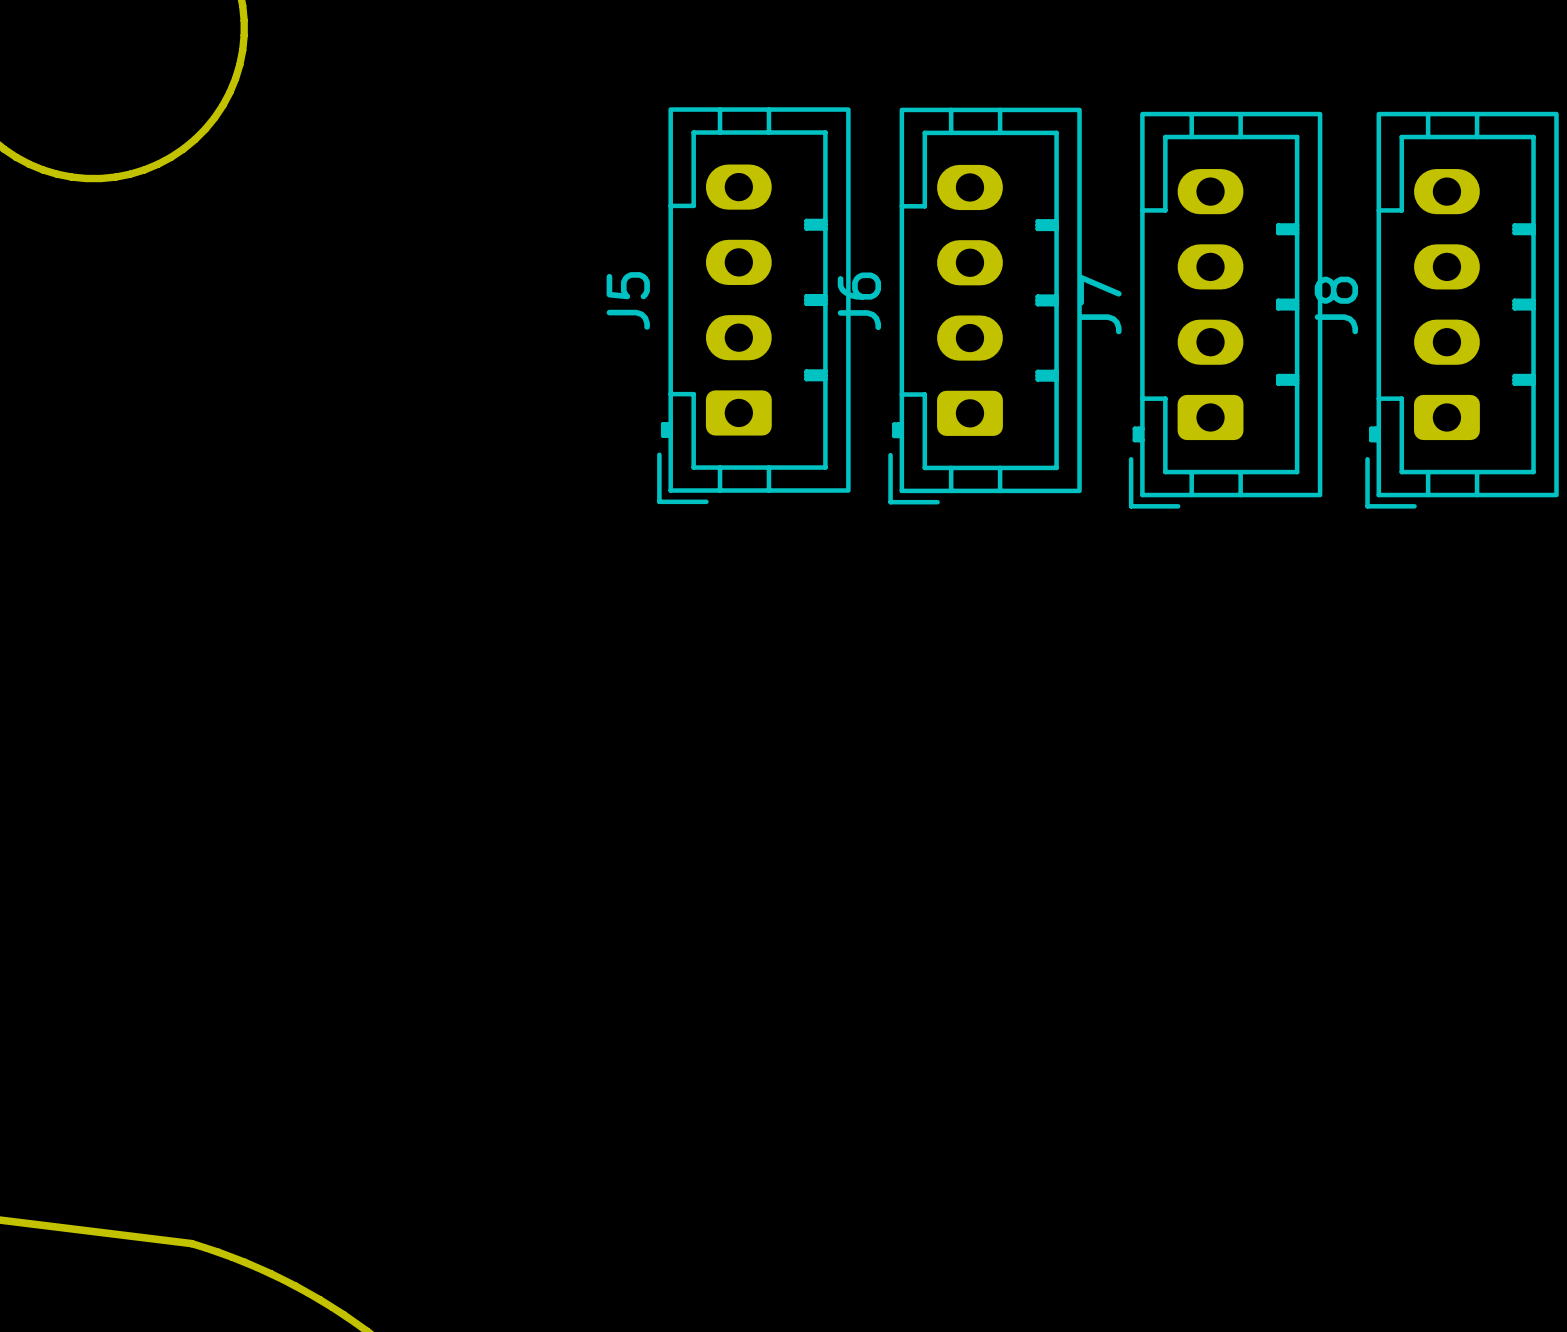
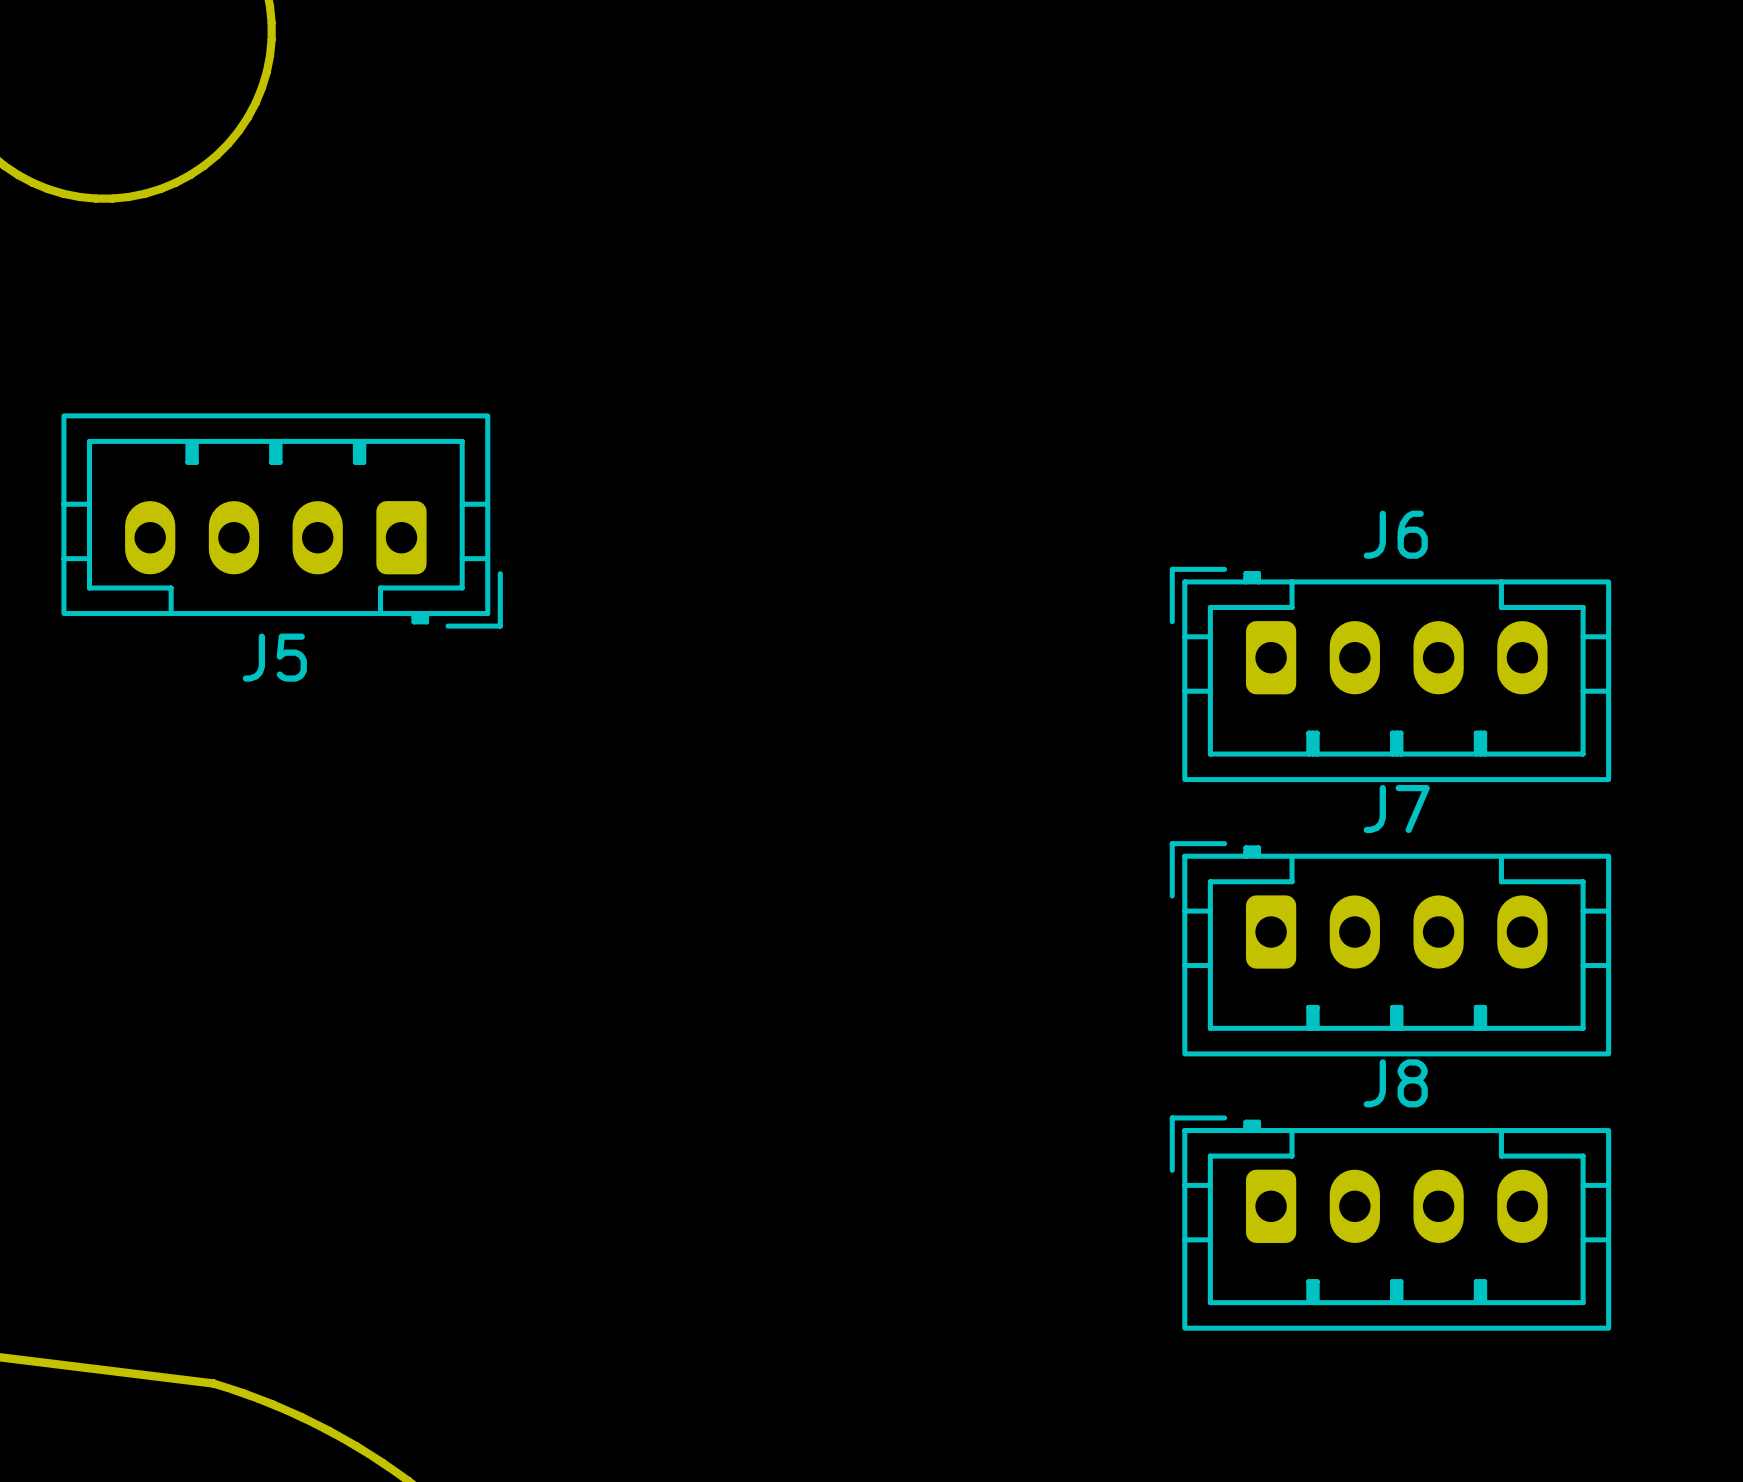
J5 rotation: 0° (753, 305) -> 90° counterclockwise (282, 520)
J5 position: (753, 305) -> (282, 520)
J6 rotation: 0° (985, 306) -> 90° clockwise (1390, 674)
J6 position: (985, 306) -> (1390, 674)
J7 rotation: 0° (1225, 310) -> 90° clockwise (1390, 948)
J7 position: (1225, 310) -> (1390, 948)
J8 rotation: 0° (1462, 310) -> 90° clockwise (1390, 1223)
J8 position: (1462, 310) -> (1390, 1223)

